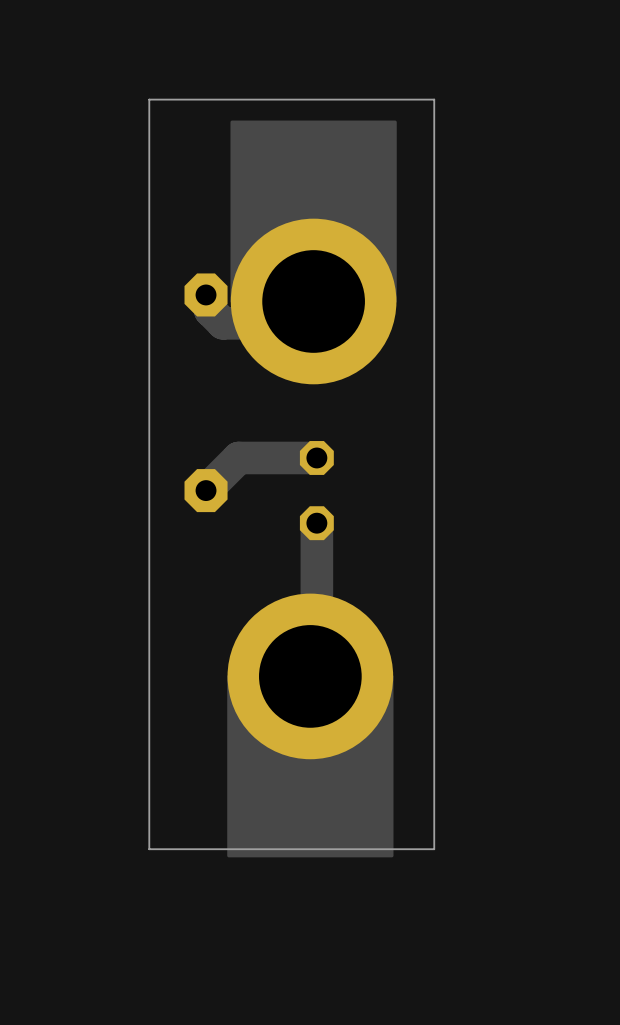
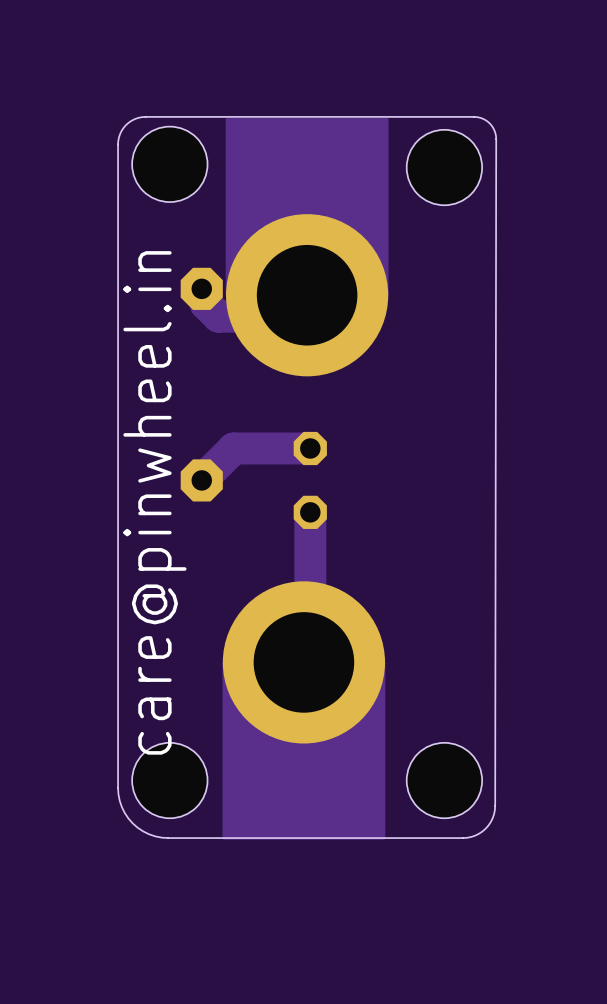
board edge: (434, 99) (149, 99) (149, 849) (434, 849) (434, 99) -> (473, 116) (481, 118) (489, 123) (494, 129) (496, 139) (495, 805) (492, 818) (485, 828) (479, 833) (462, 838) (168, 838) (149, 834) (137, 827) (128, 818) (119, 800) (118, 787) (118, 144) (120, 133) (131, 120) (145, 116) (473, 116)
hole: none -> (169, 164)
hole: none -> (444, 167)
text: none -> care@pinwheel.in (154, 502)
hole: none -> (169, 780)
hole: none -> (444, 780)

